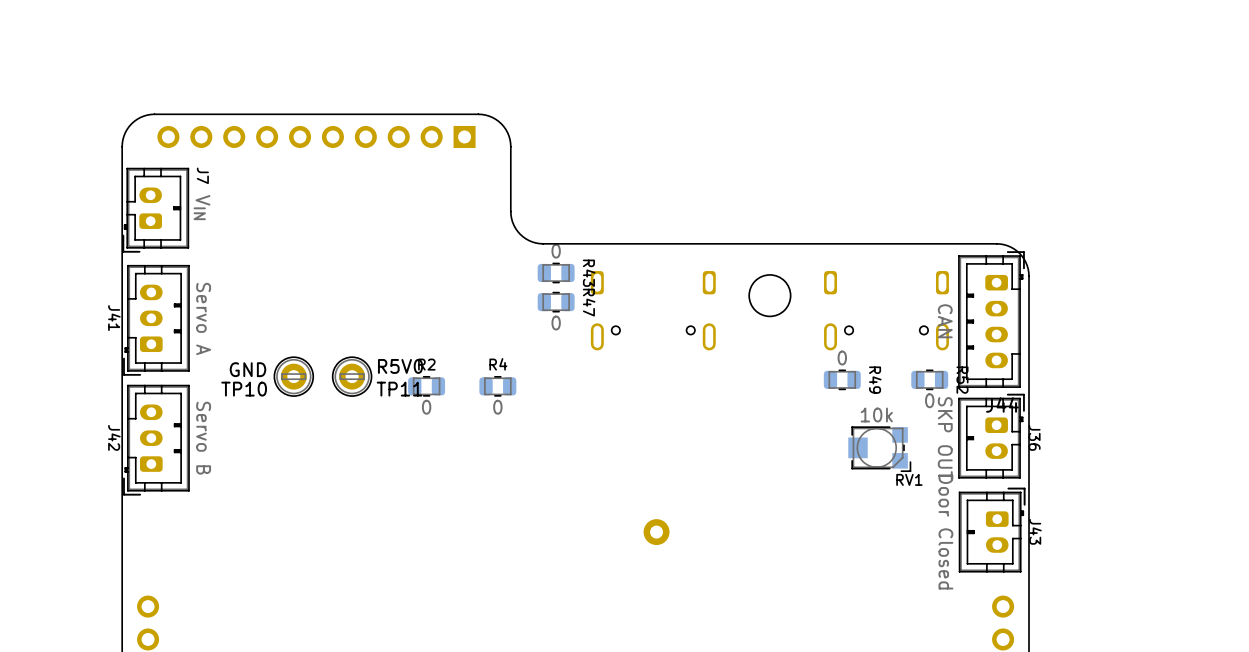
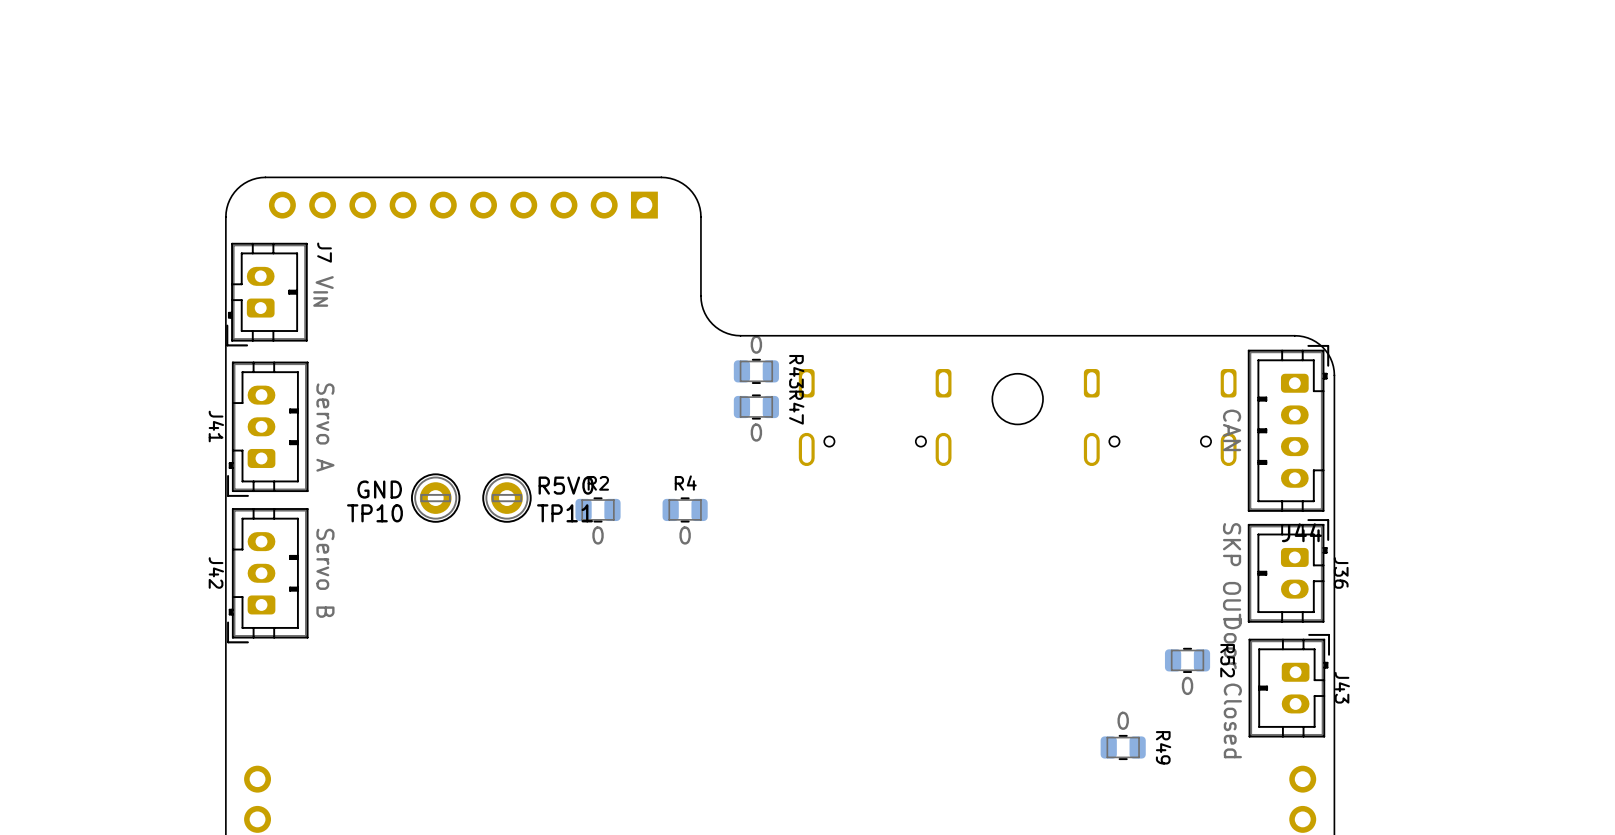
R49 position: (842, 379) -> (1123, 747)
R52 position: (929, 379) -> (1187, 660)
RV1: 10k (879, 449) -> none
part: (656, 532) -> none

